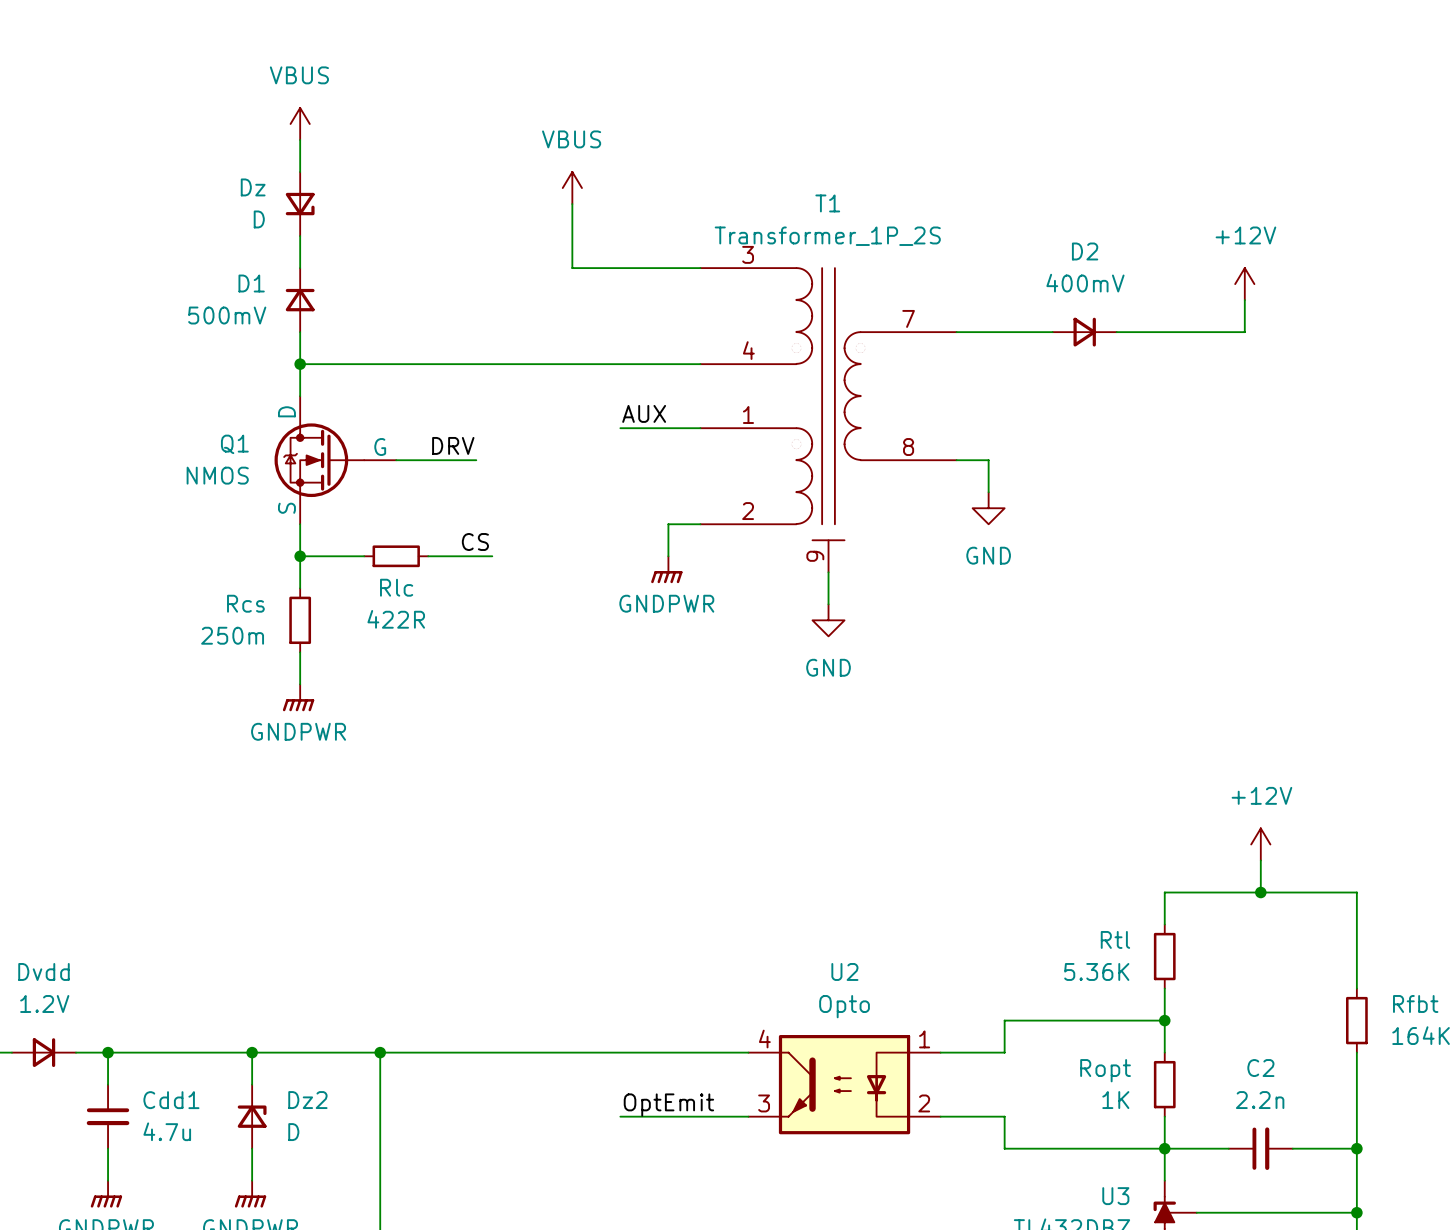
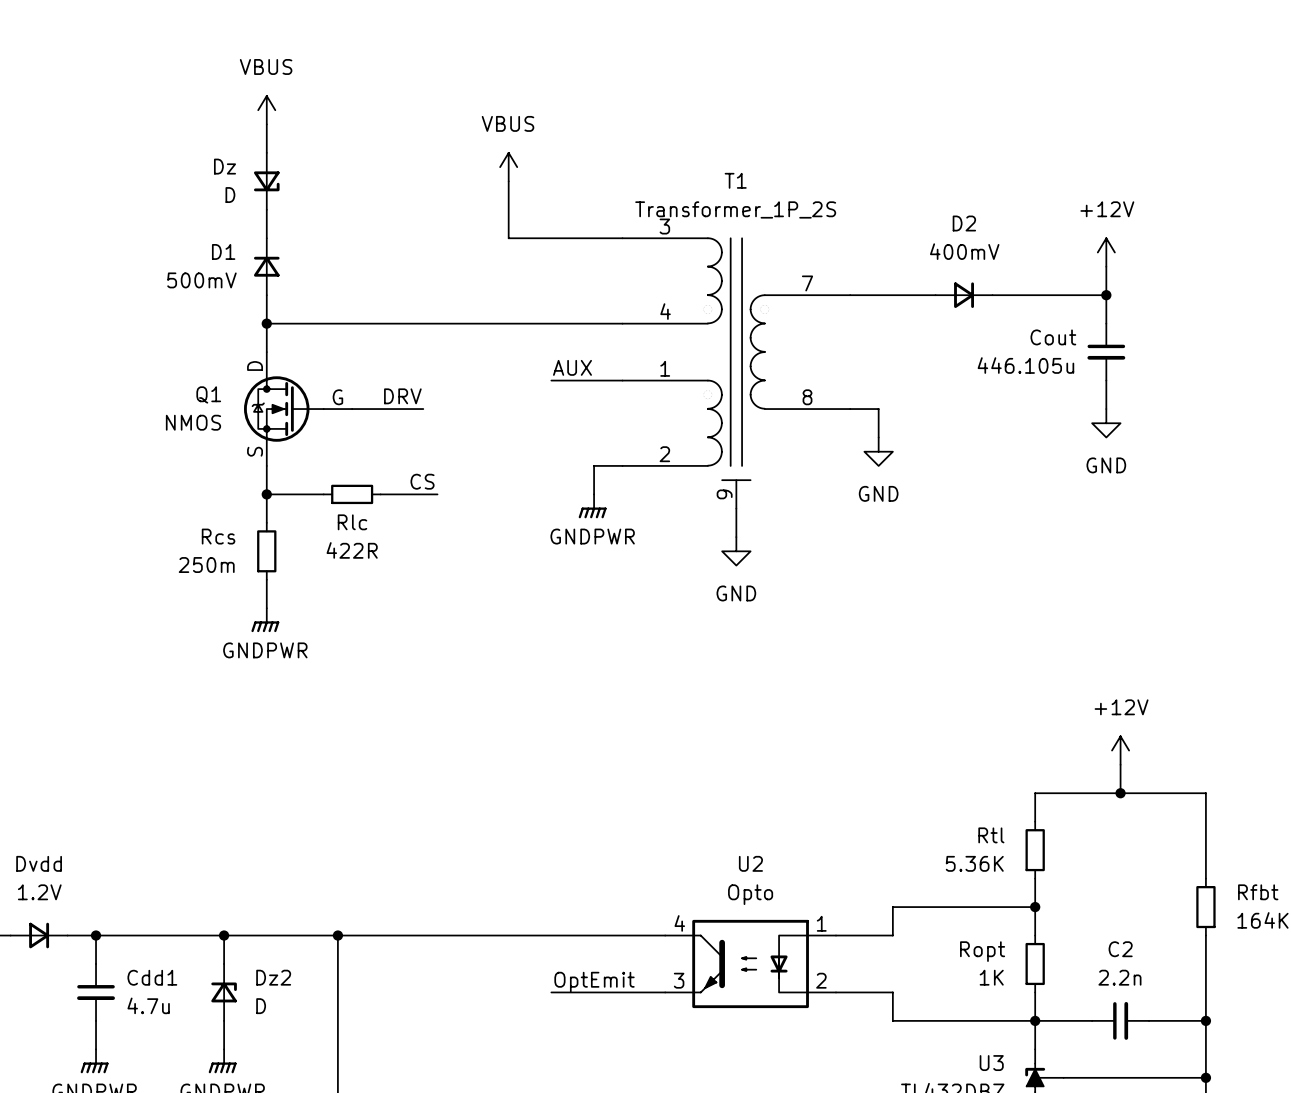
wire: none -> (1106, 295) (1106, 323)
junction: none -> (1106, 295)
Cout: none -> 446.105u (1106, 352)
wire: none -> (1106, 380) (1106, 409)
power symbol: none -> GND (1106, 423)

